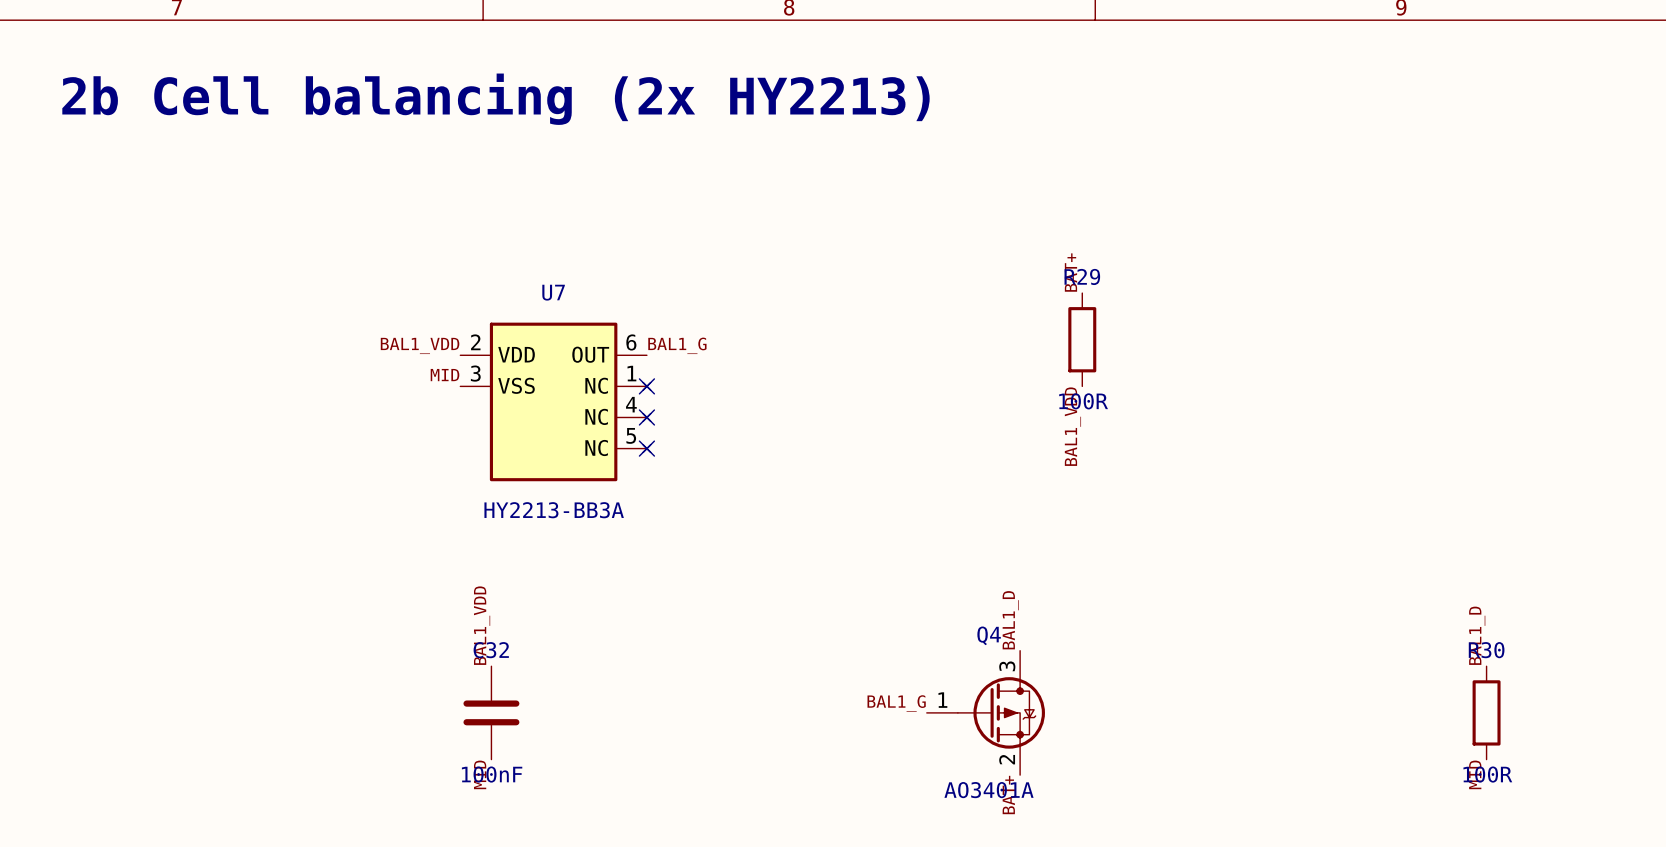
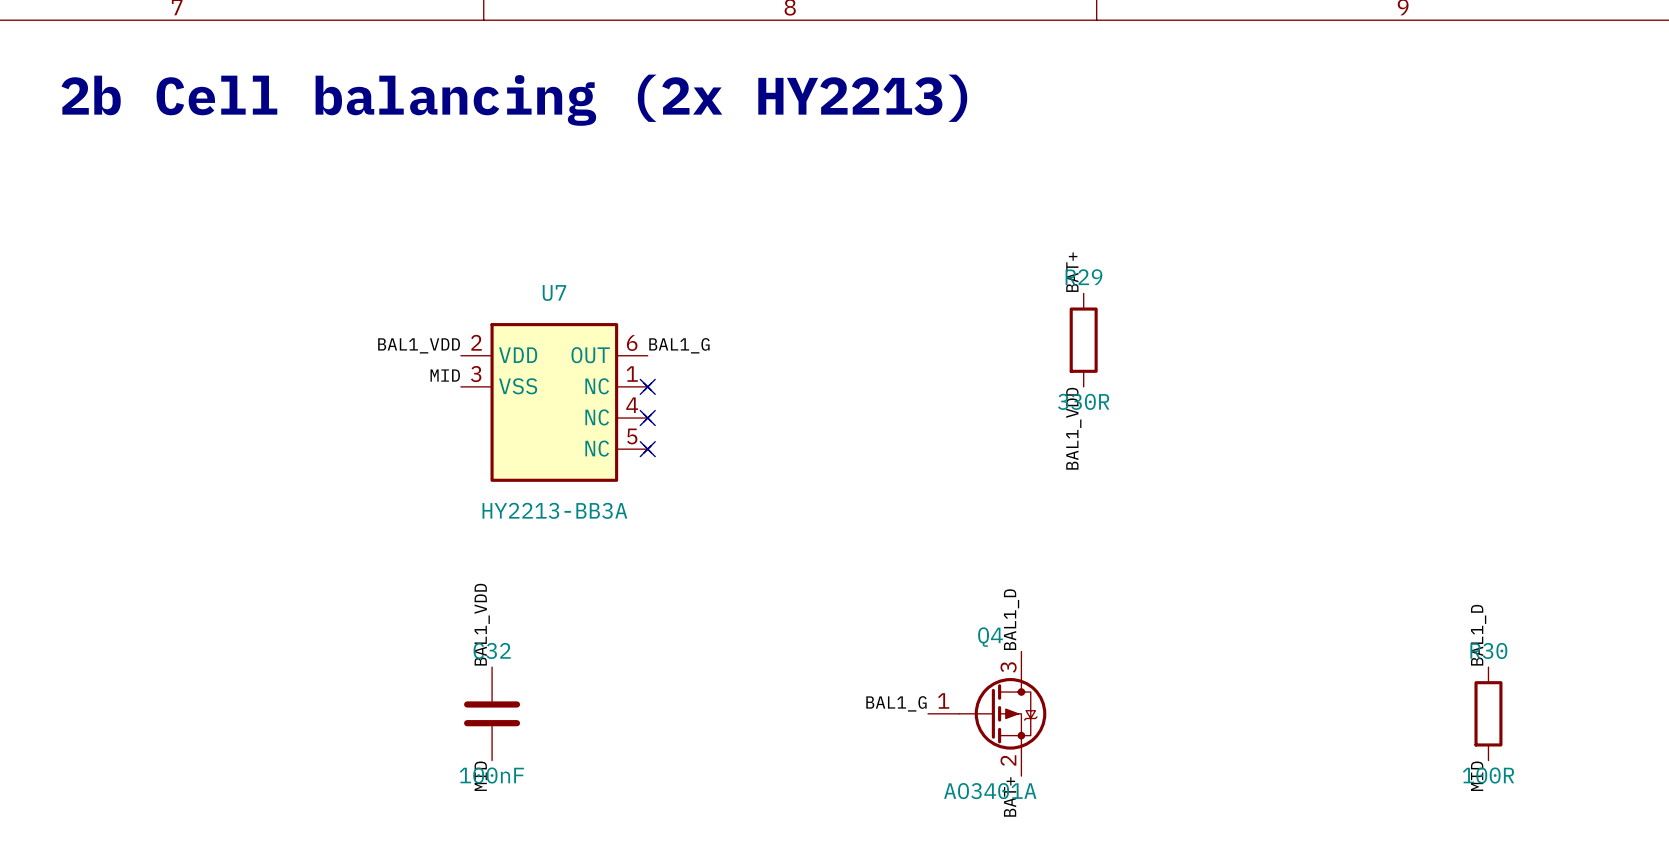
R29 value: 100R (1083, 401) -> 330R (1083, 401)

